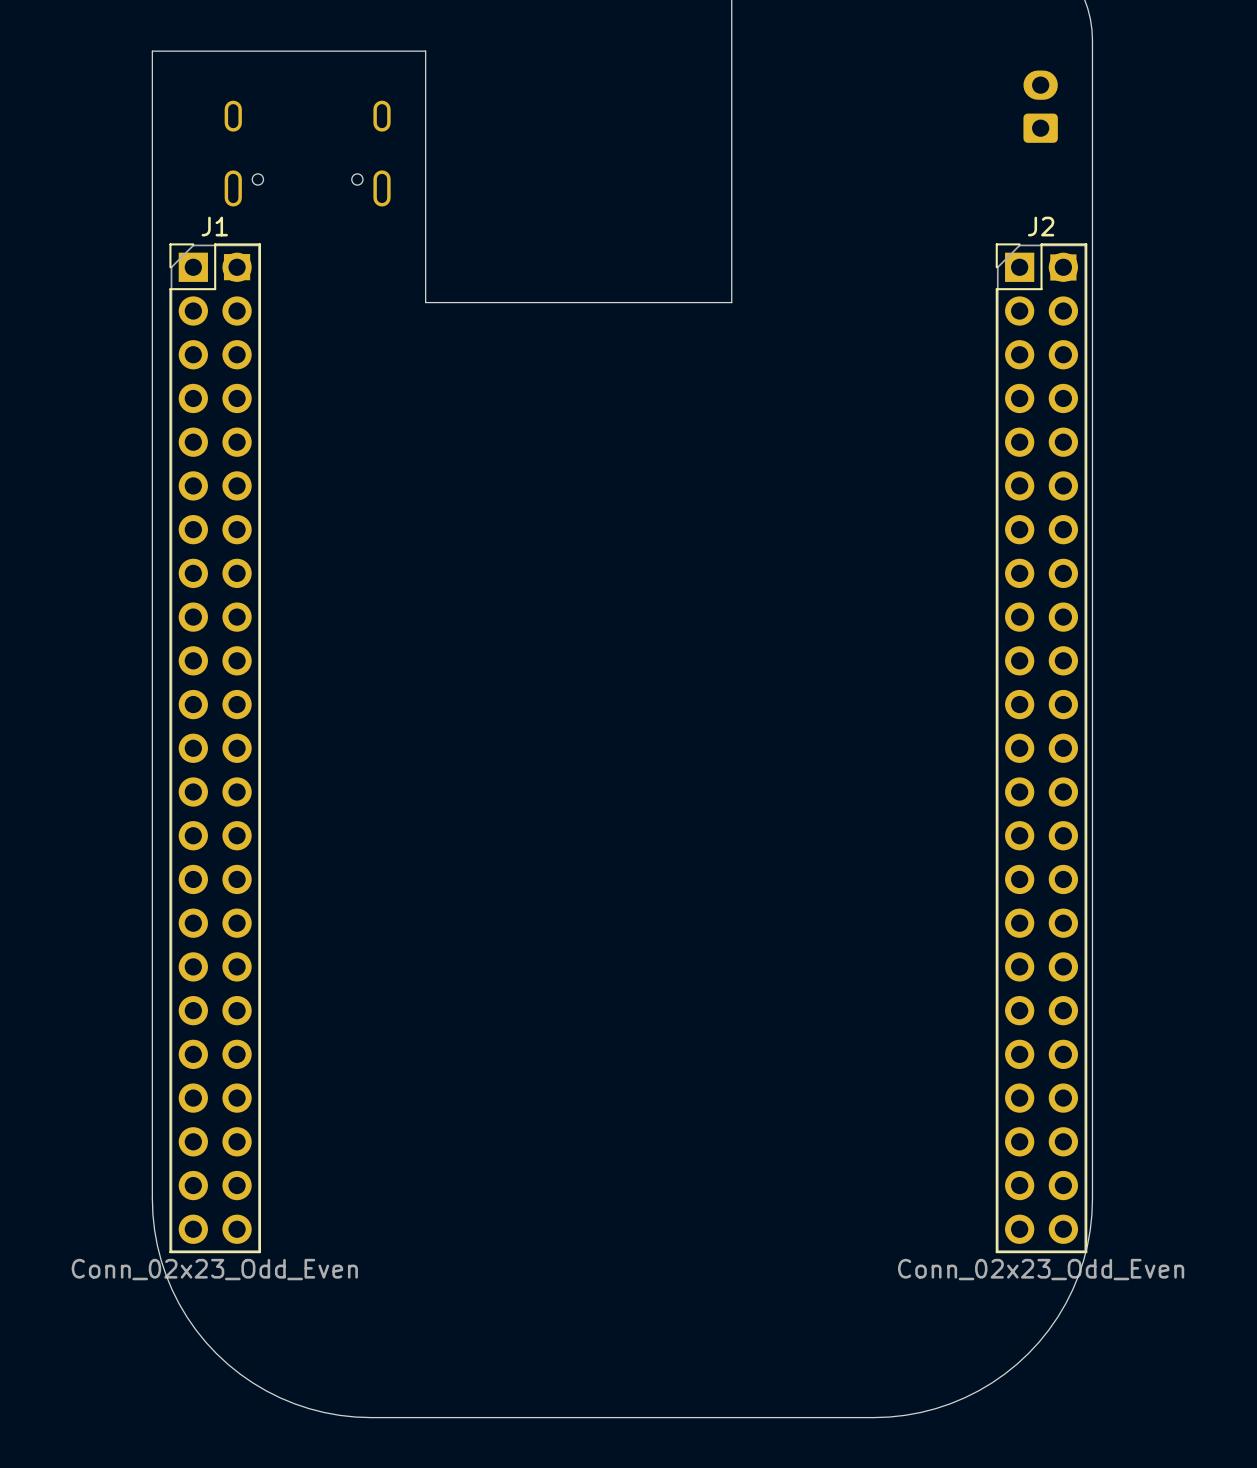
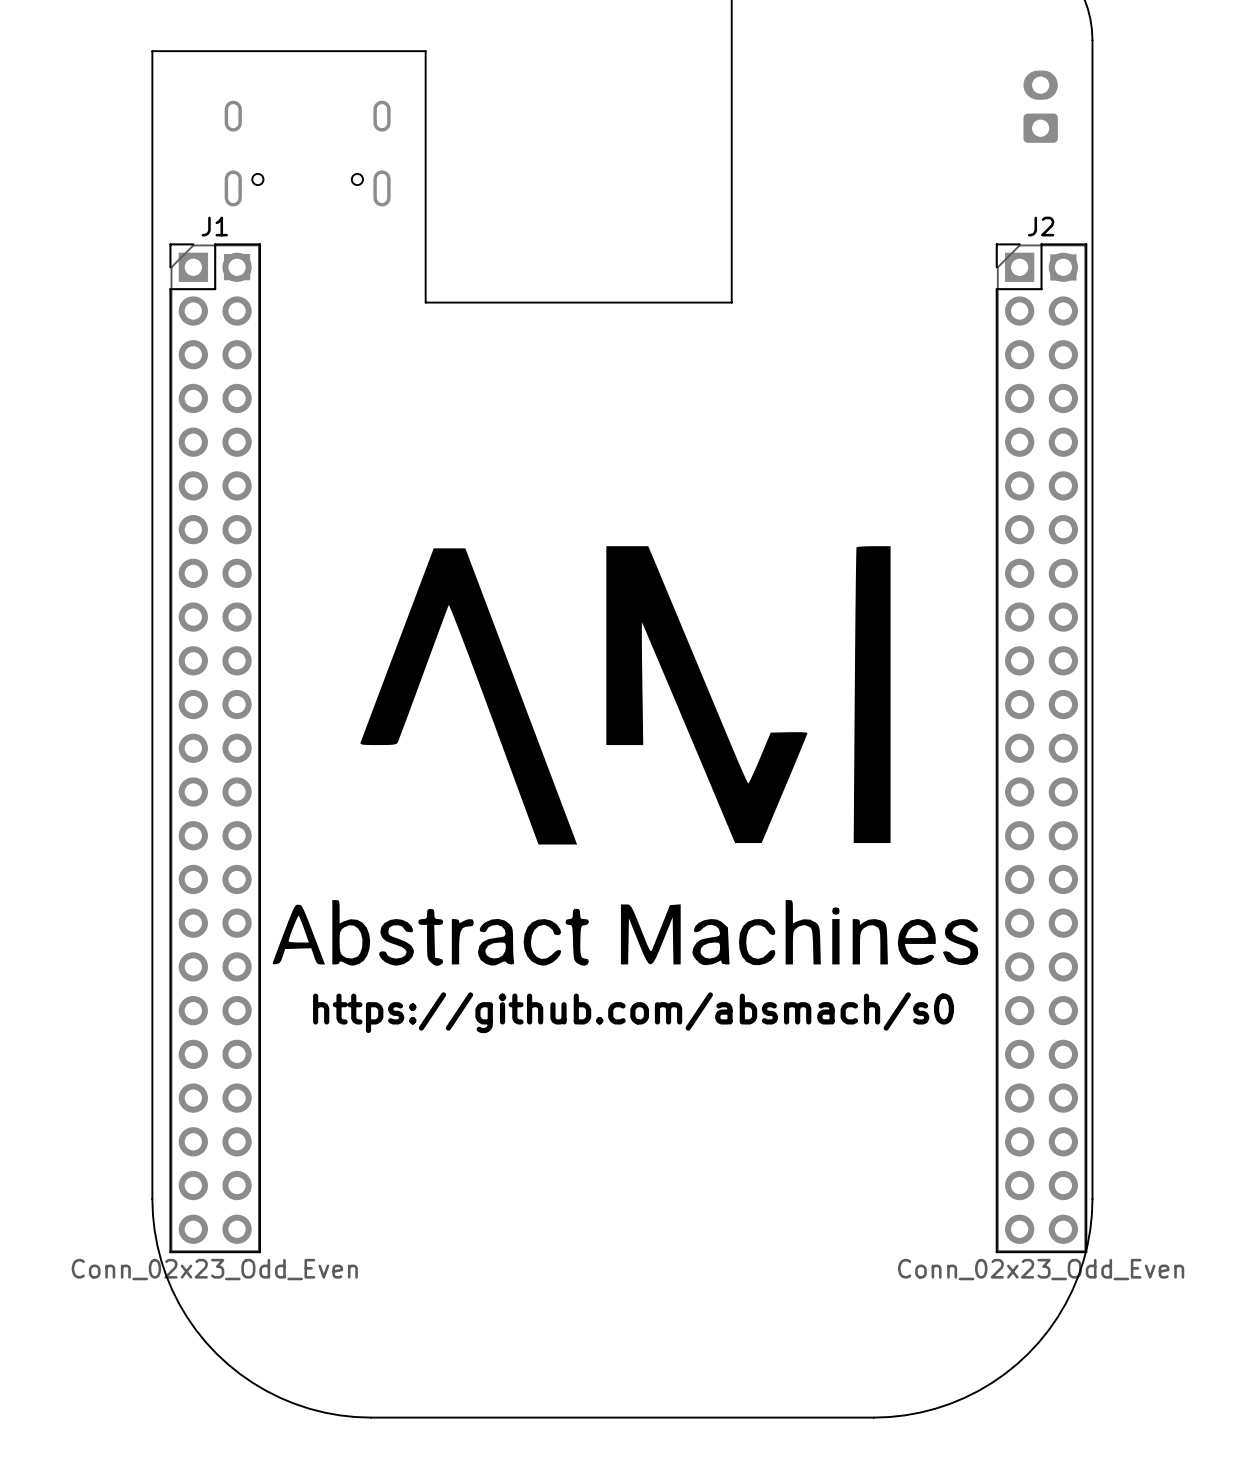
drawing: none -> [272, 546, 979, 966]
text: none -> https://github.com/absmach/s0 (633, 1012)

